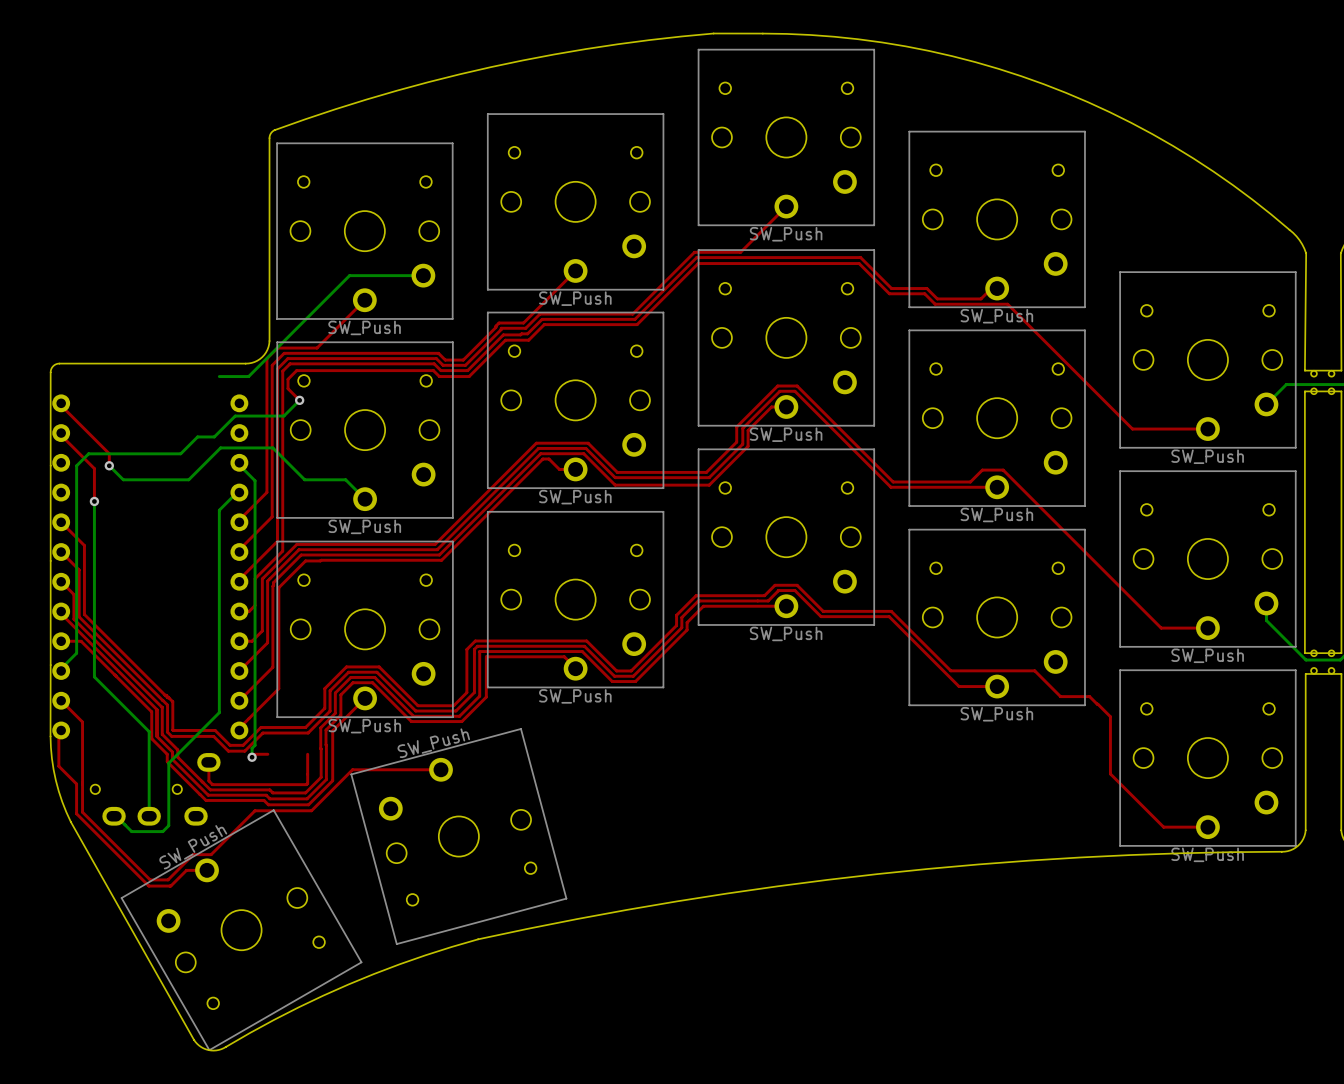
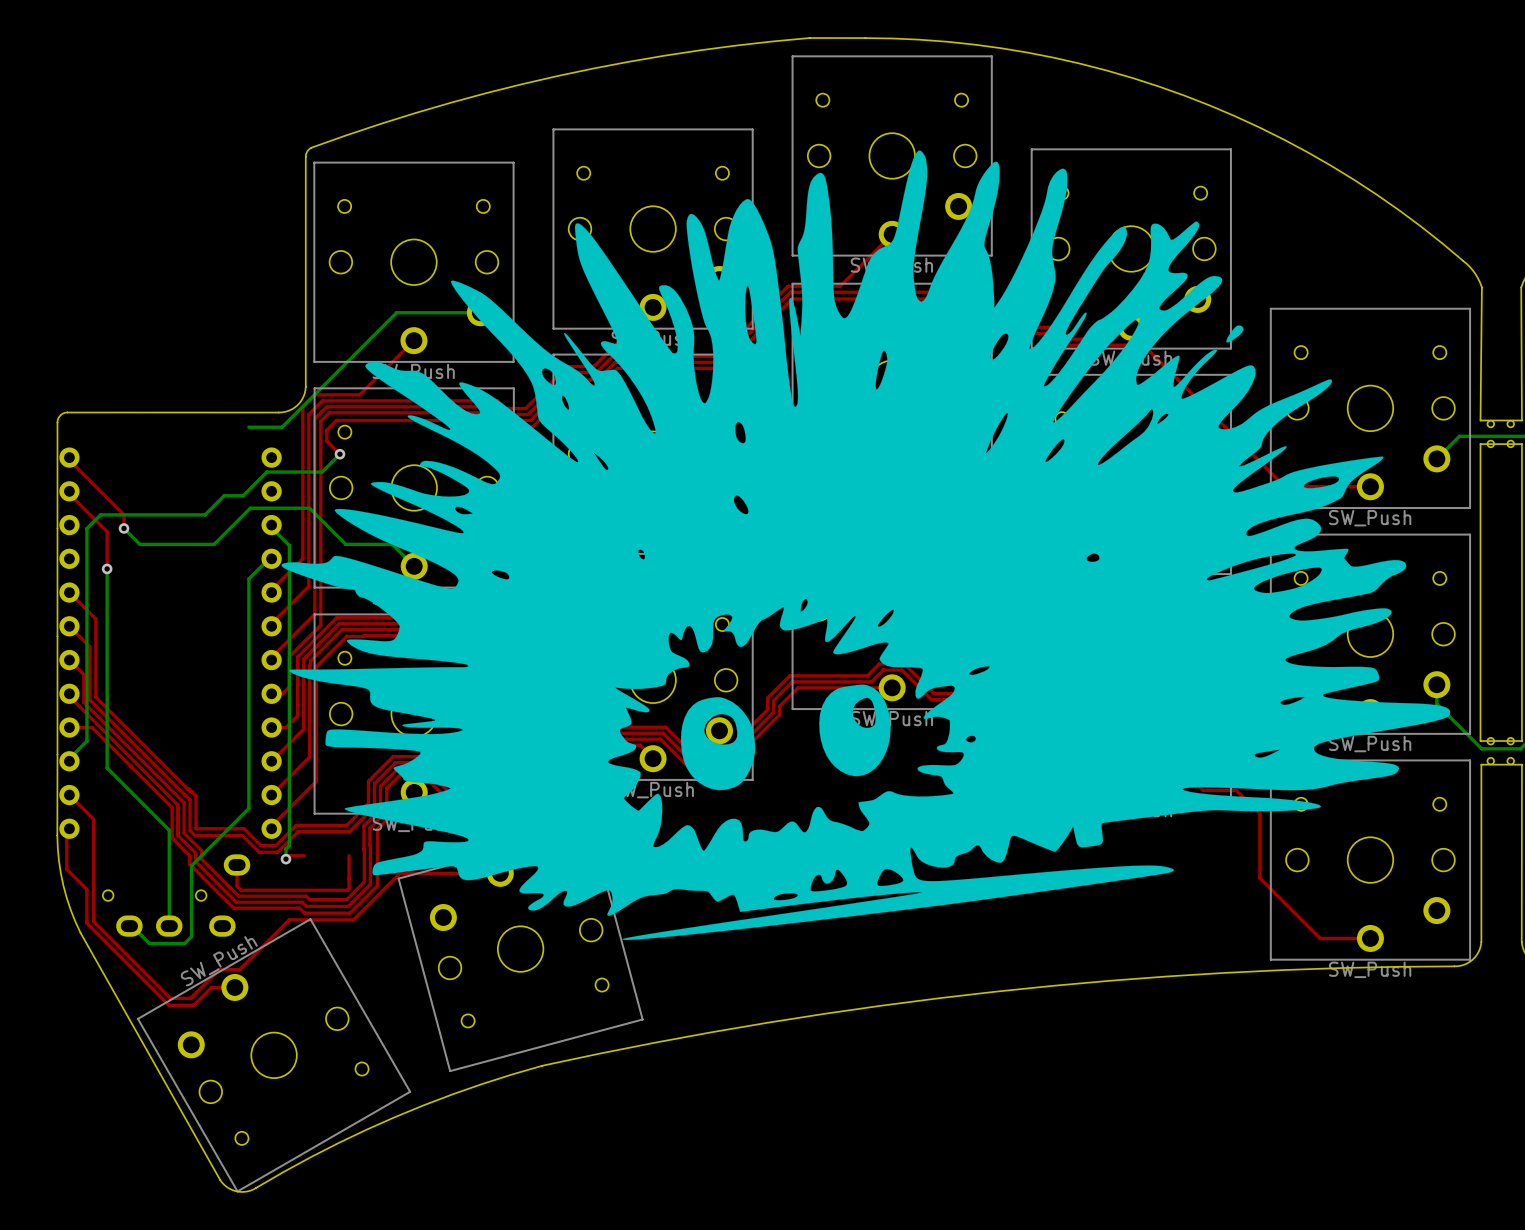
drawing: none -> [281, 150, 1451, 940]

